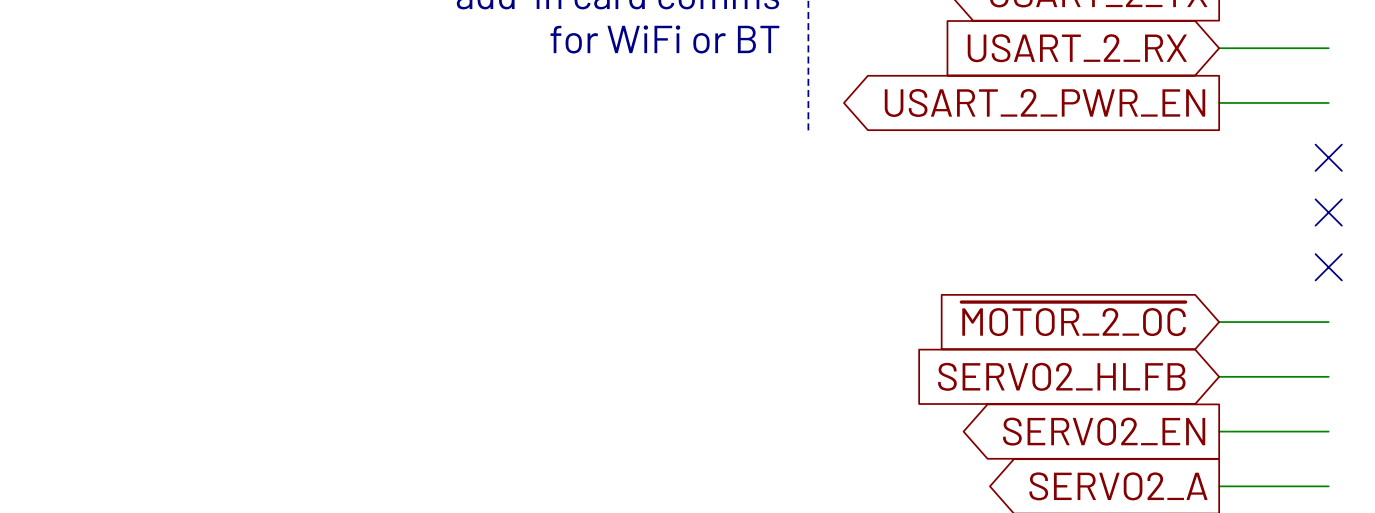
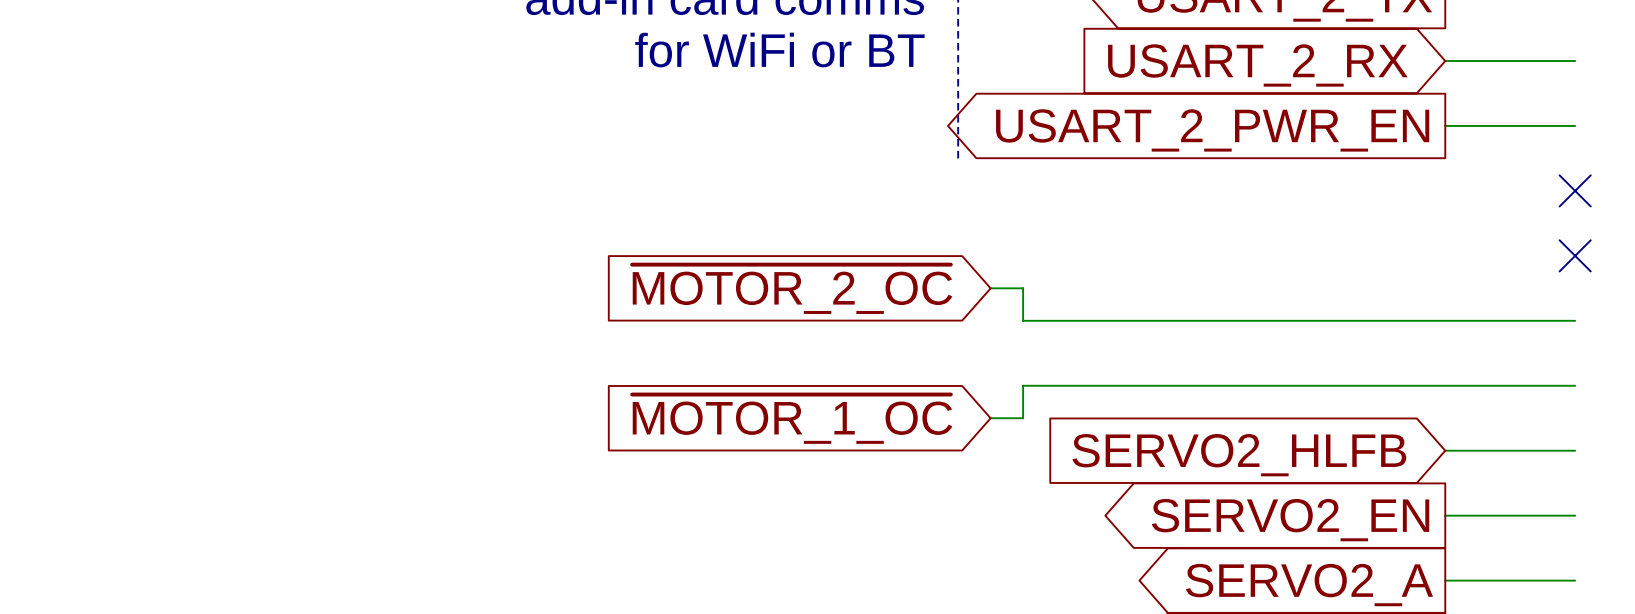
wire: none -> (990, 288) (1023, 288) (1023, 320) (1575, 320)
no-connect mark: (1328, 267) -> none
global label position: ~{MOTOR_2_OC} (1073, 319) -> ~{MOTOR_2_OC} (792, 289)
wire: none -> (1445, 385) (1023, 385) (1023, 418) (990, 418)
global label: none -> ~{MOTOR_1_OC} (792, 419)

